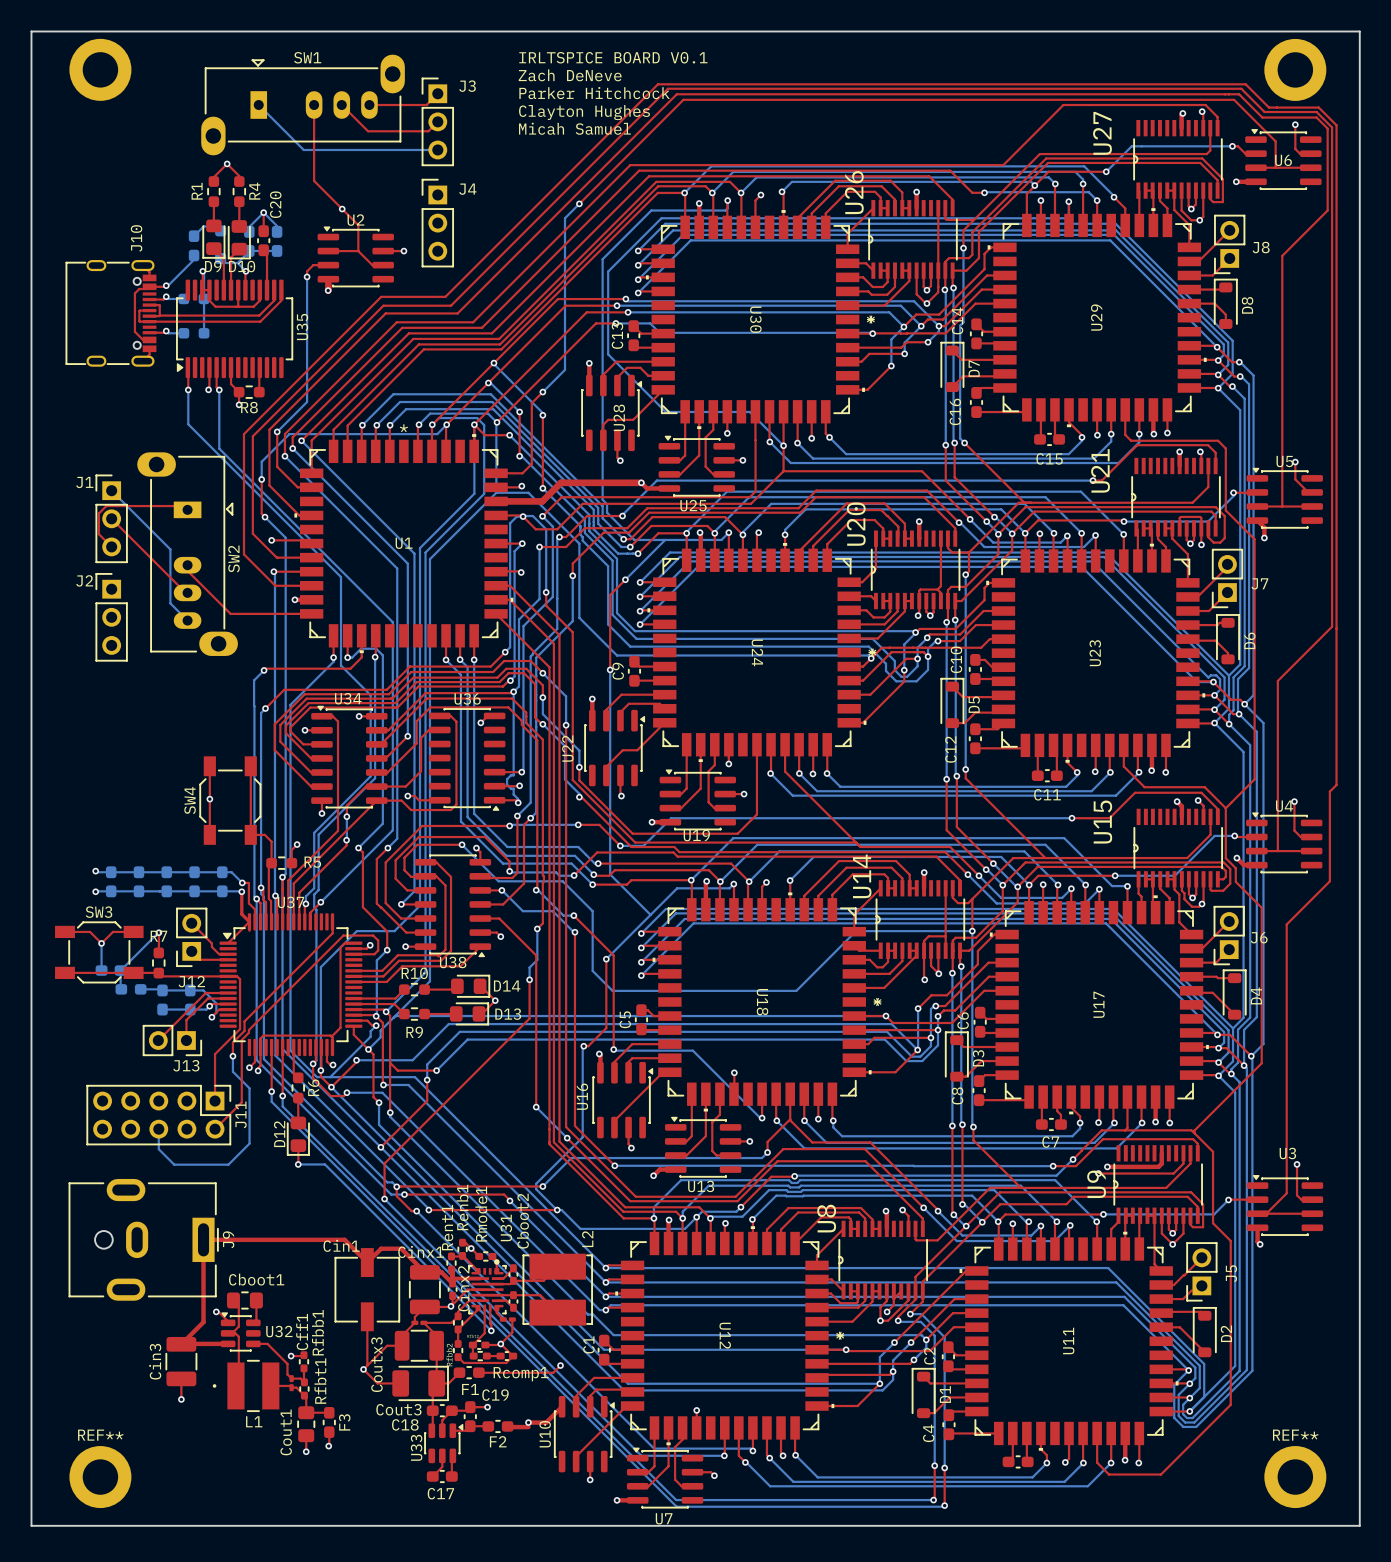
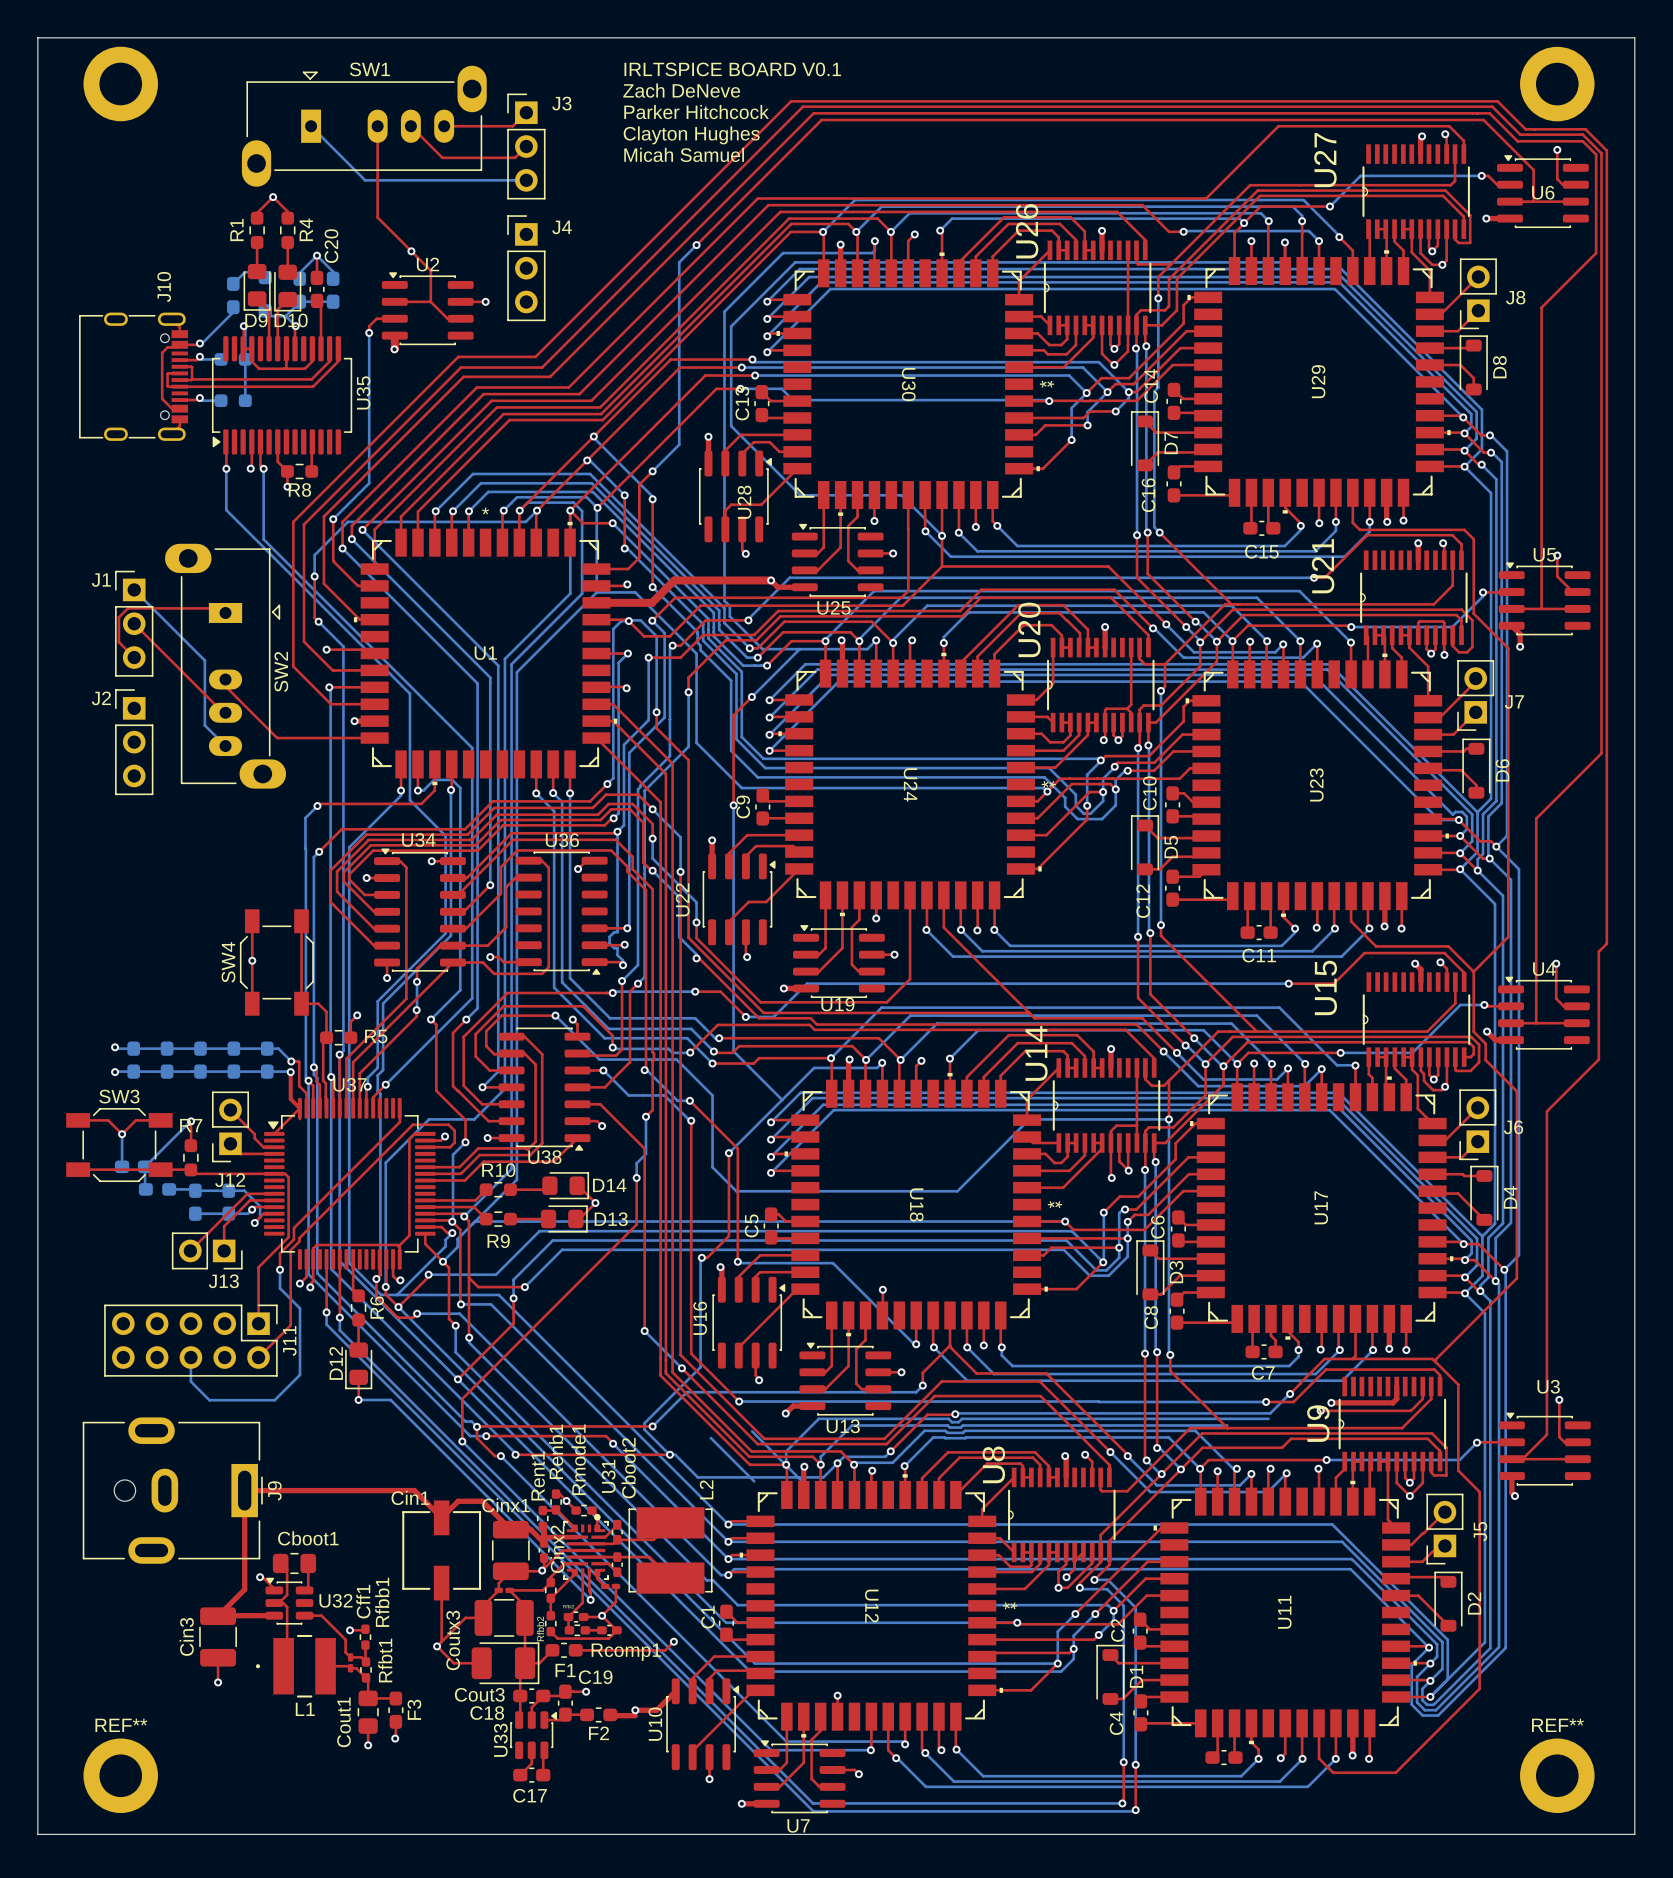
bottom track: (1055, 1180) (1096, 1221) -> none
bottom track: (1020, 1185) (1056, 1221) -> none
bottom track: none -> (752, 1431) (802, 1481)
bottom track: none -> (710, 1438) (754, 1481)

